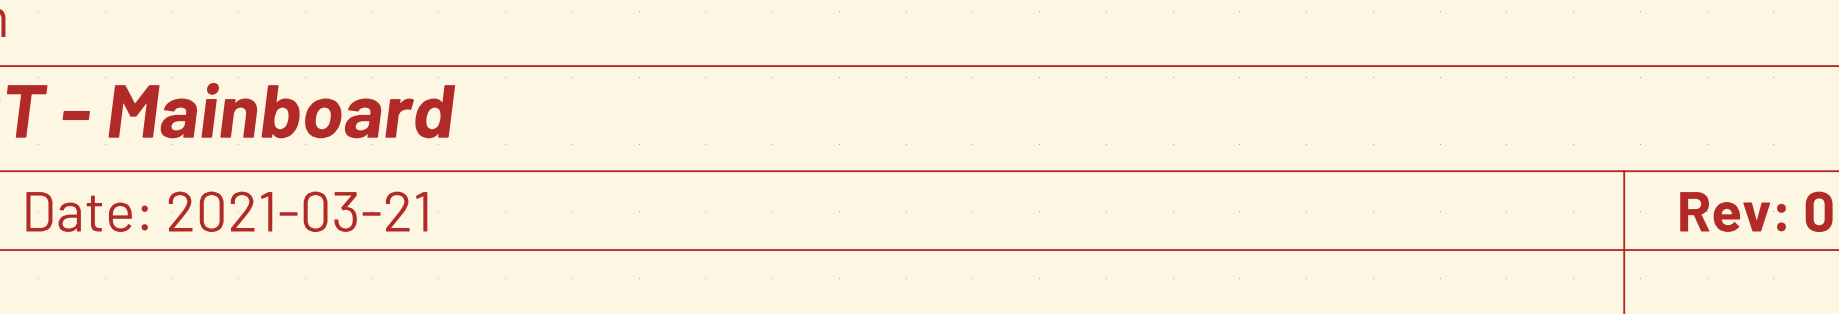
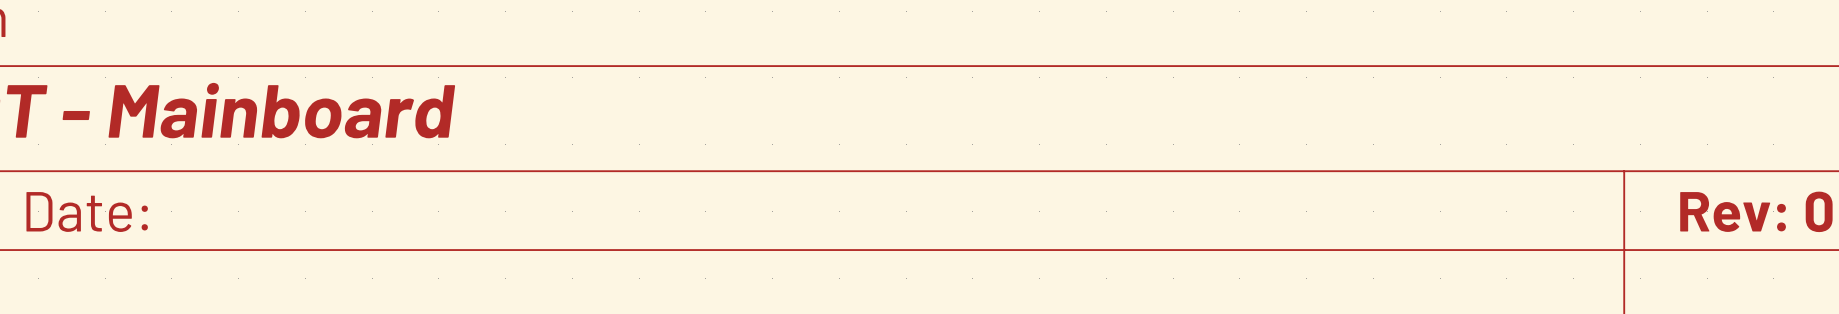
title block: Date: 2021-03-21 (226, 211) -> Date: (87, 212)

